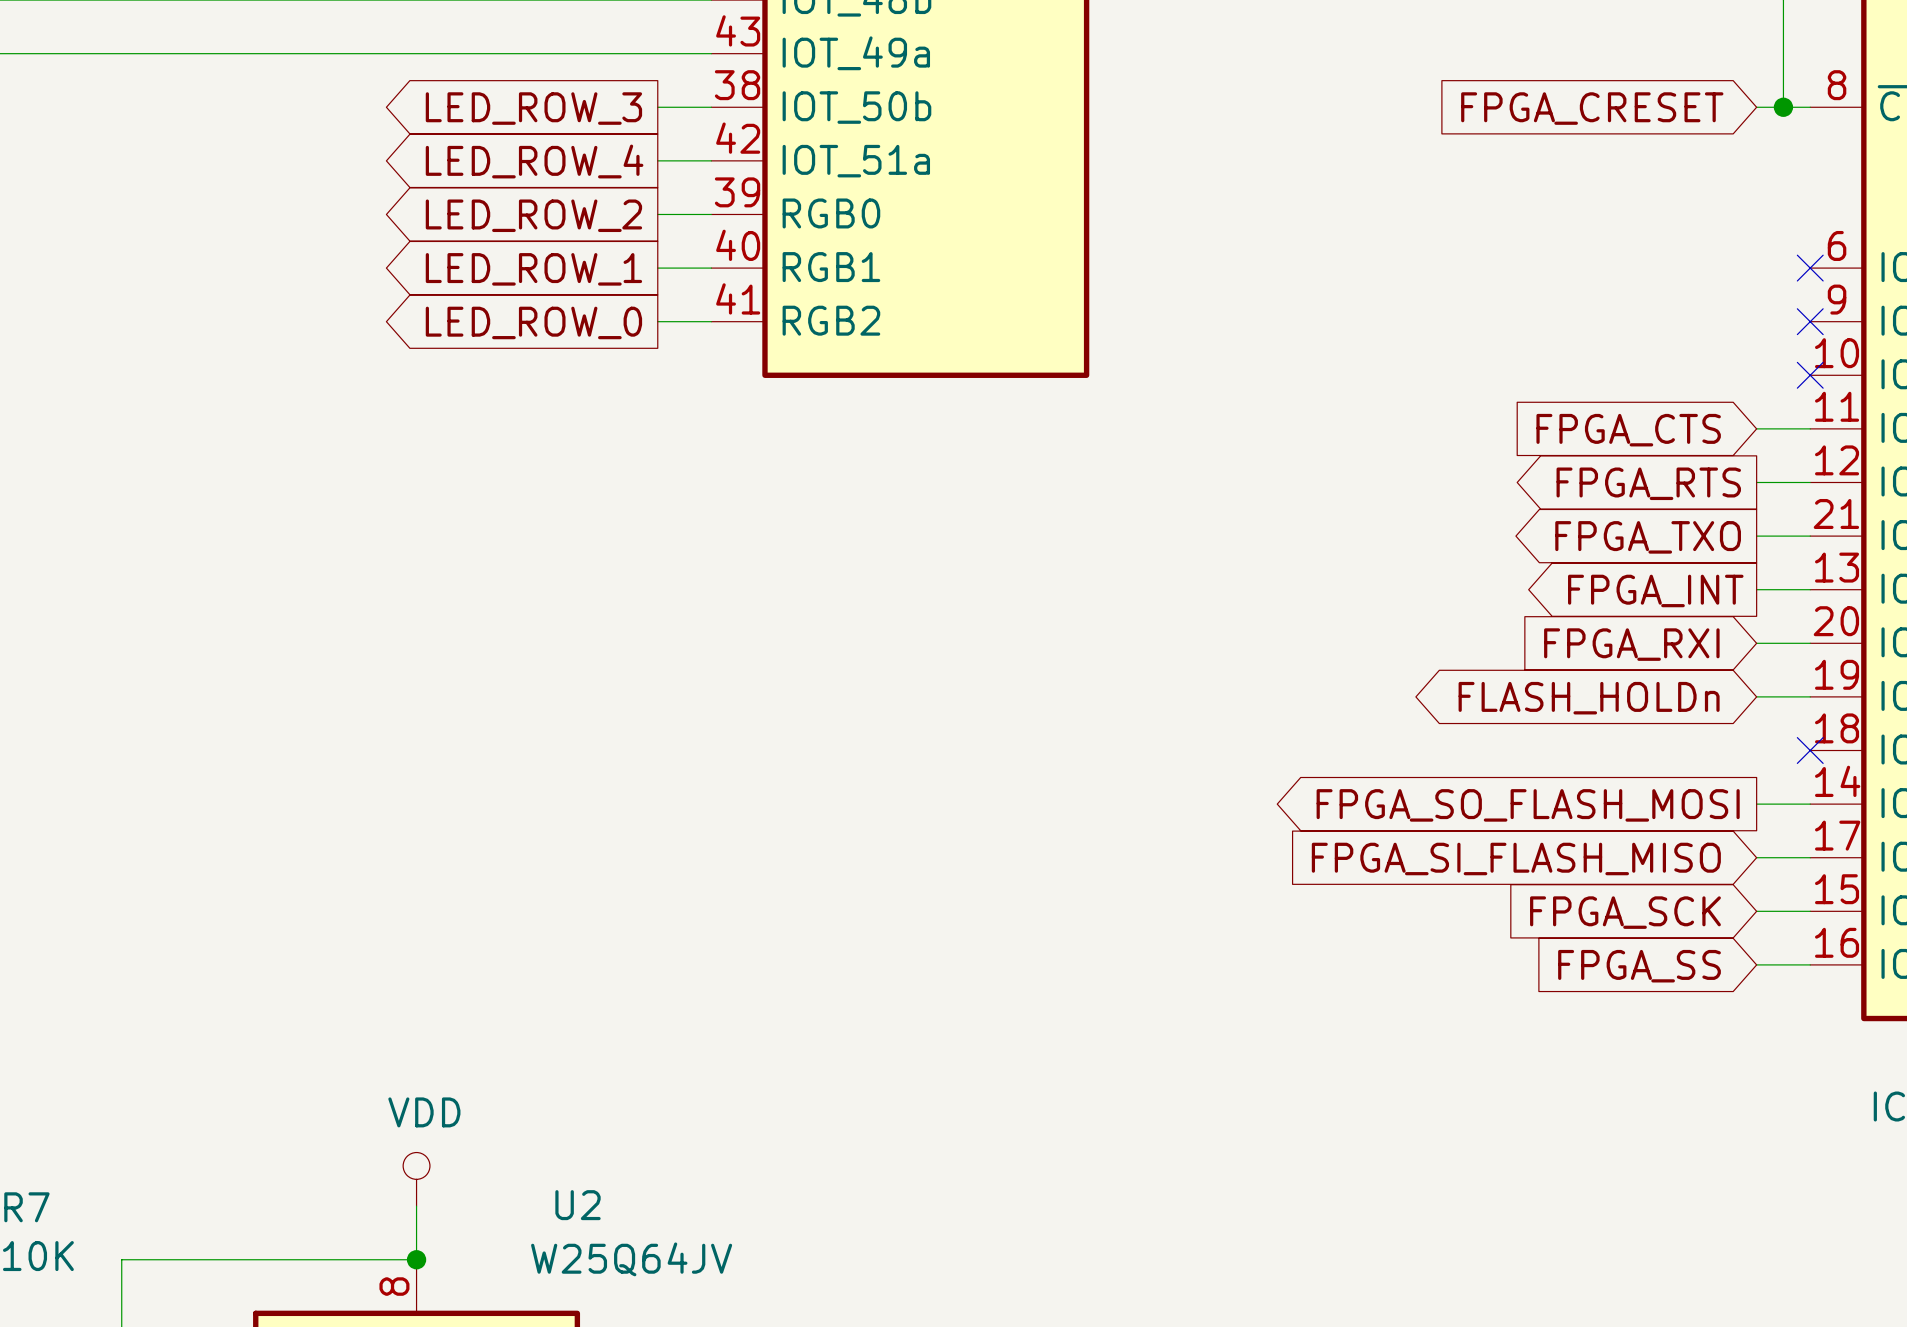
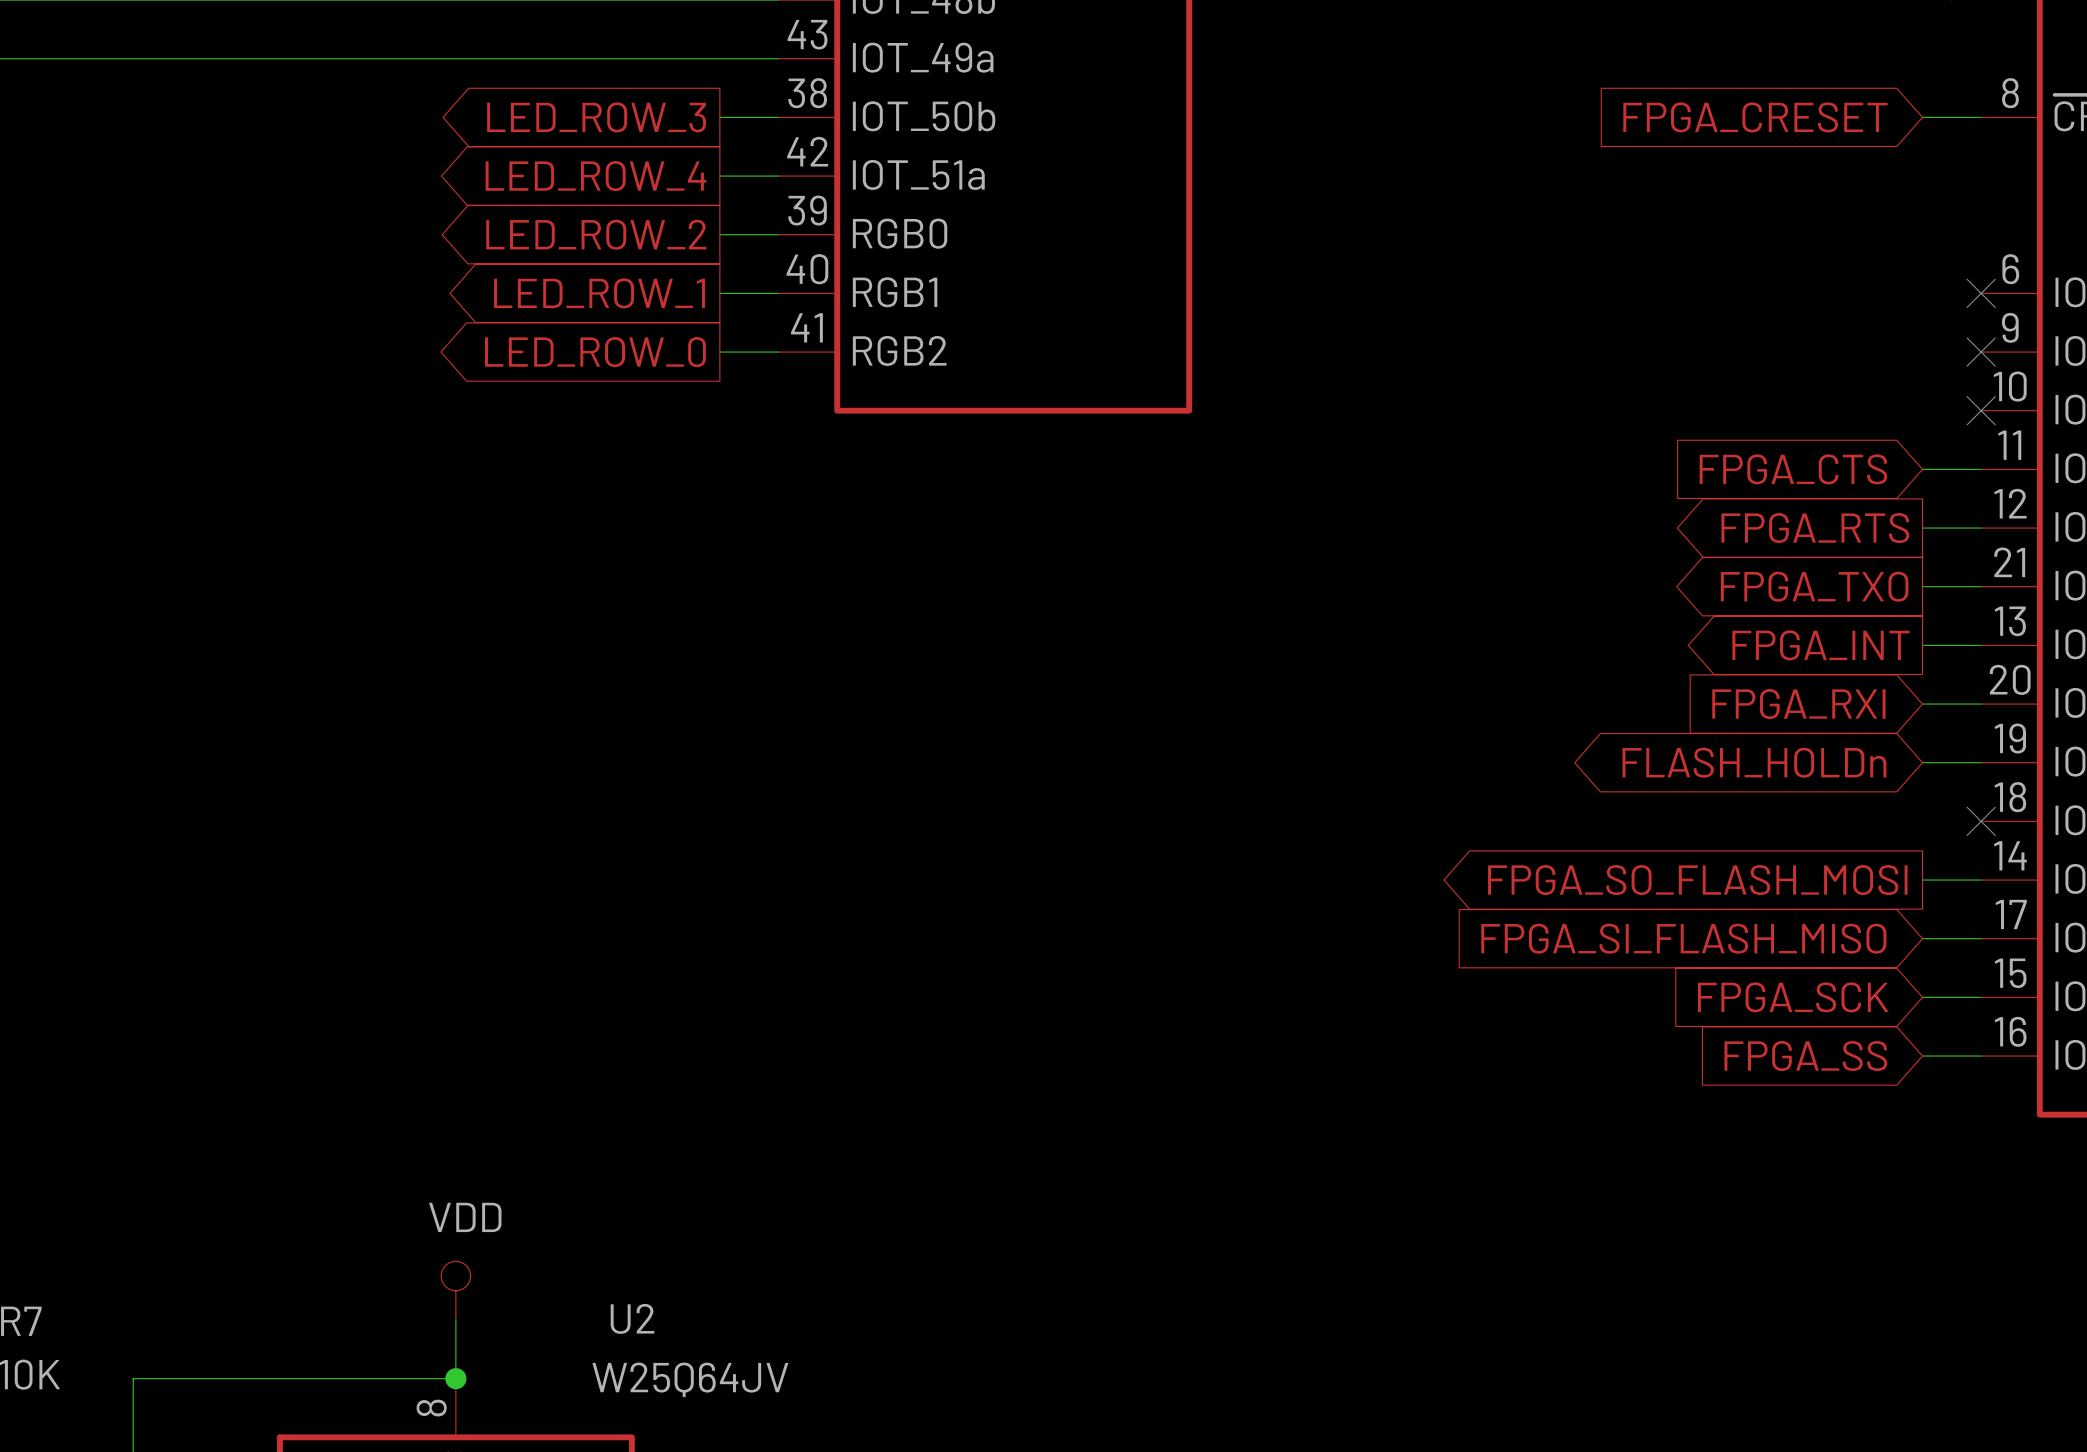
wire: (1783, 0) (1783, 107) -> none
junction: (1783, 107) -> none

